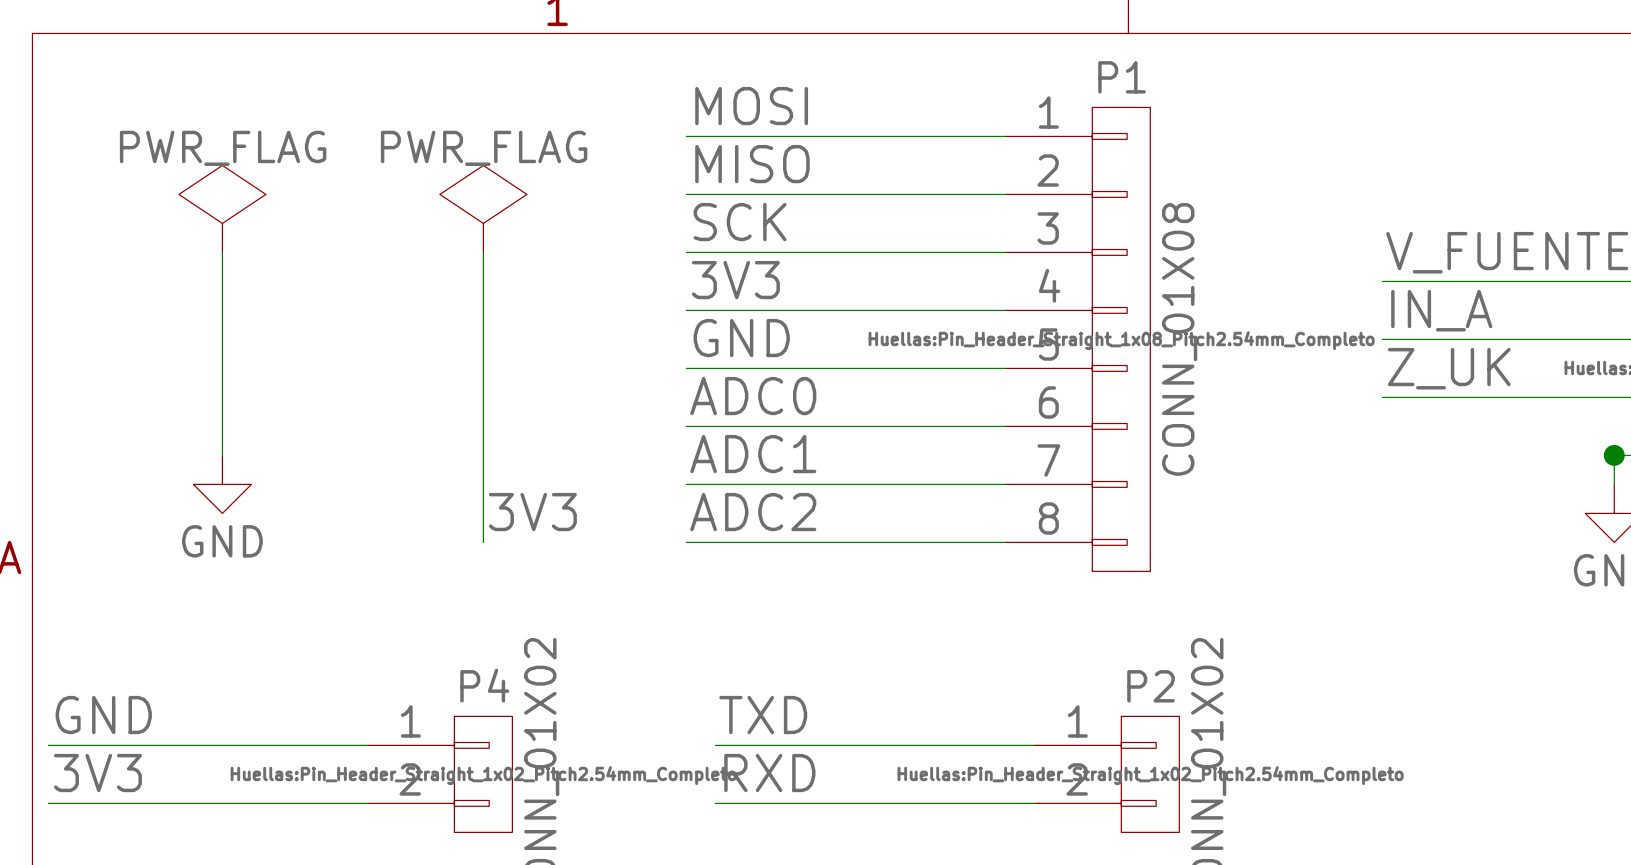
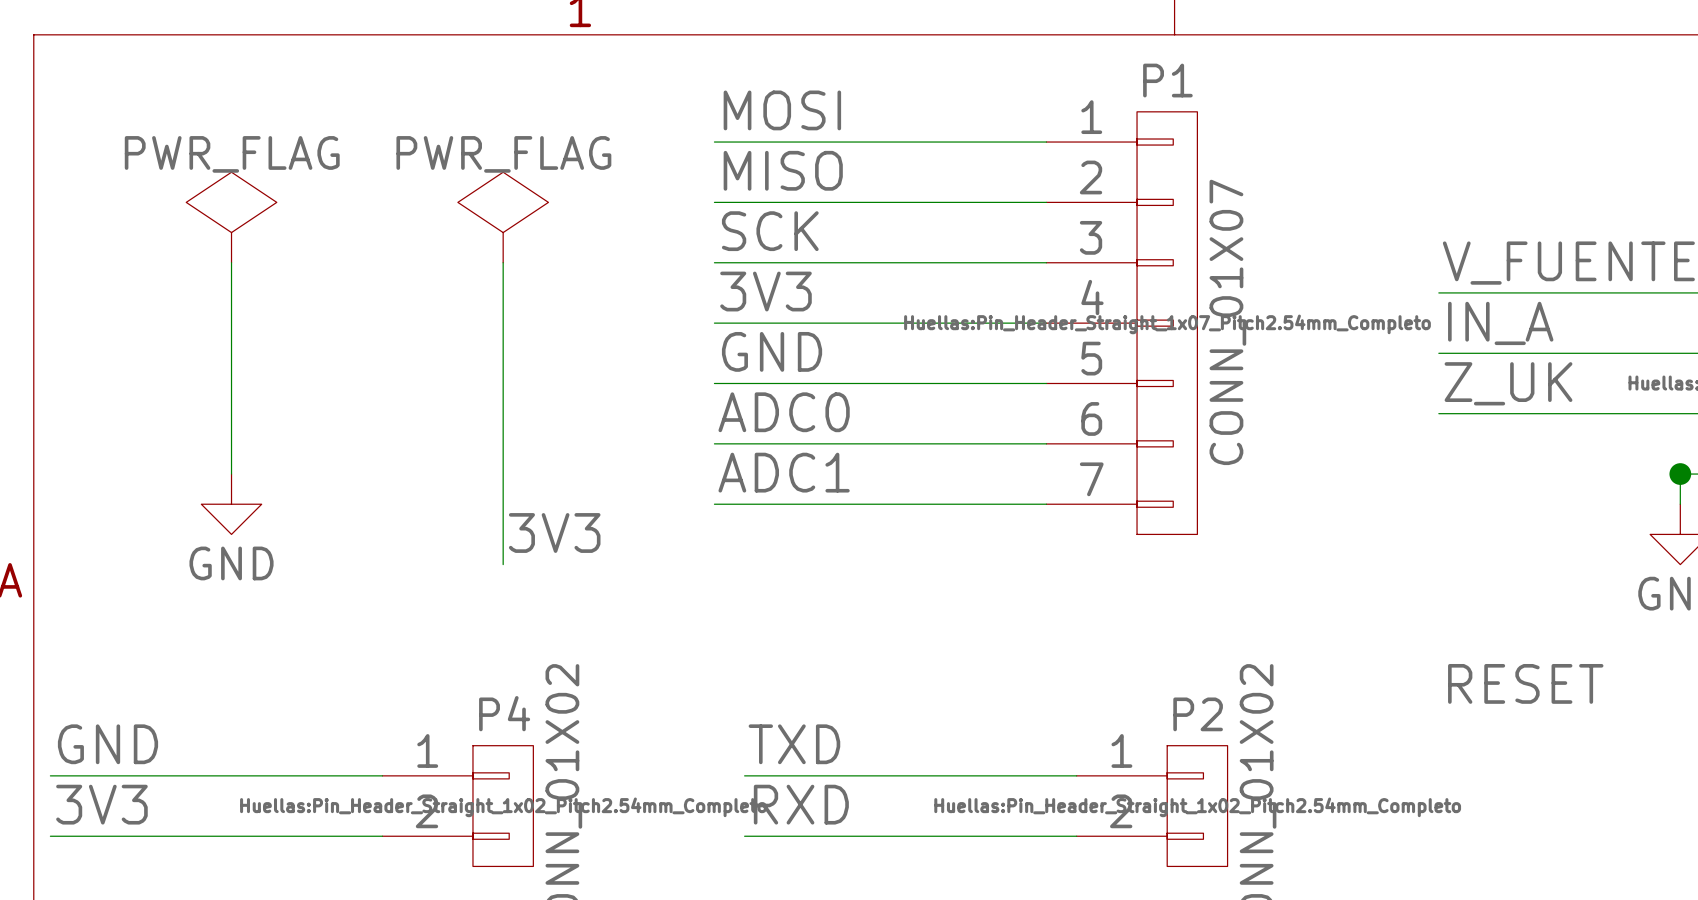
P1 symbol: [1005, 107, 1151, 572] -> [1046, 111, 1198, 535]
P1 value: CONN_01X08 (1179, 339) -> CONN_01X07 (1227, 322)
P1 text: Huellas:Pin_Header_Straight_1x08_Pitch2.54mm_Completo (1121, 340) -> Huellas:Pin_Header_Straight_1x07_Pitch2.54mm_Completo (1167, 324)
label: ADC2 (753, 512) -> none
wire: (686, 542) (1005, 542) -> none
label: none -> RESET (1525, 683)

